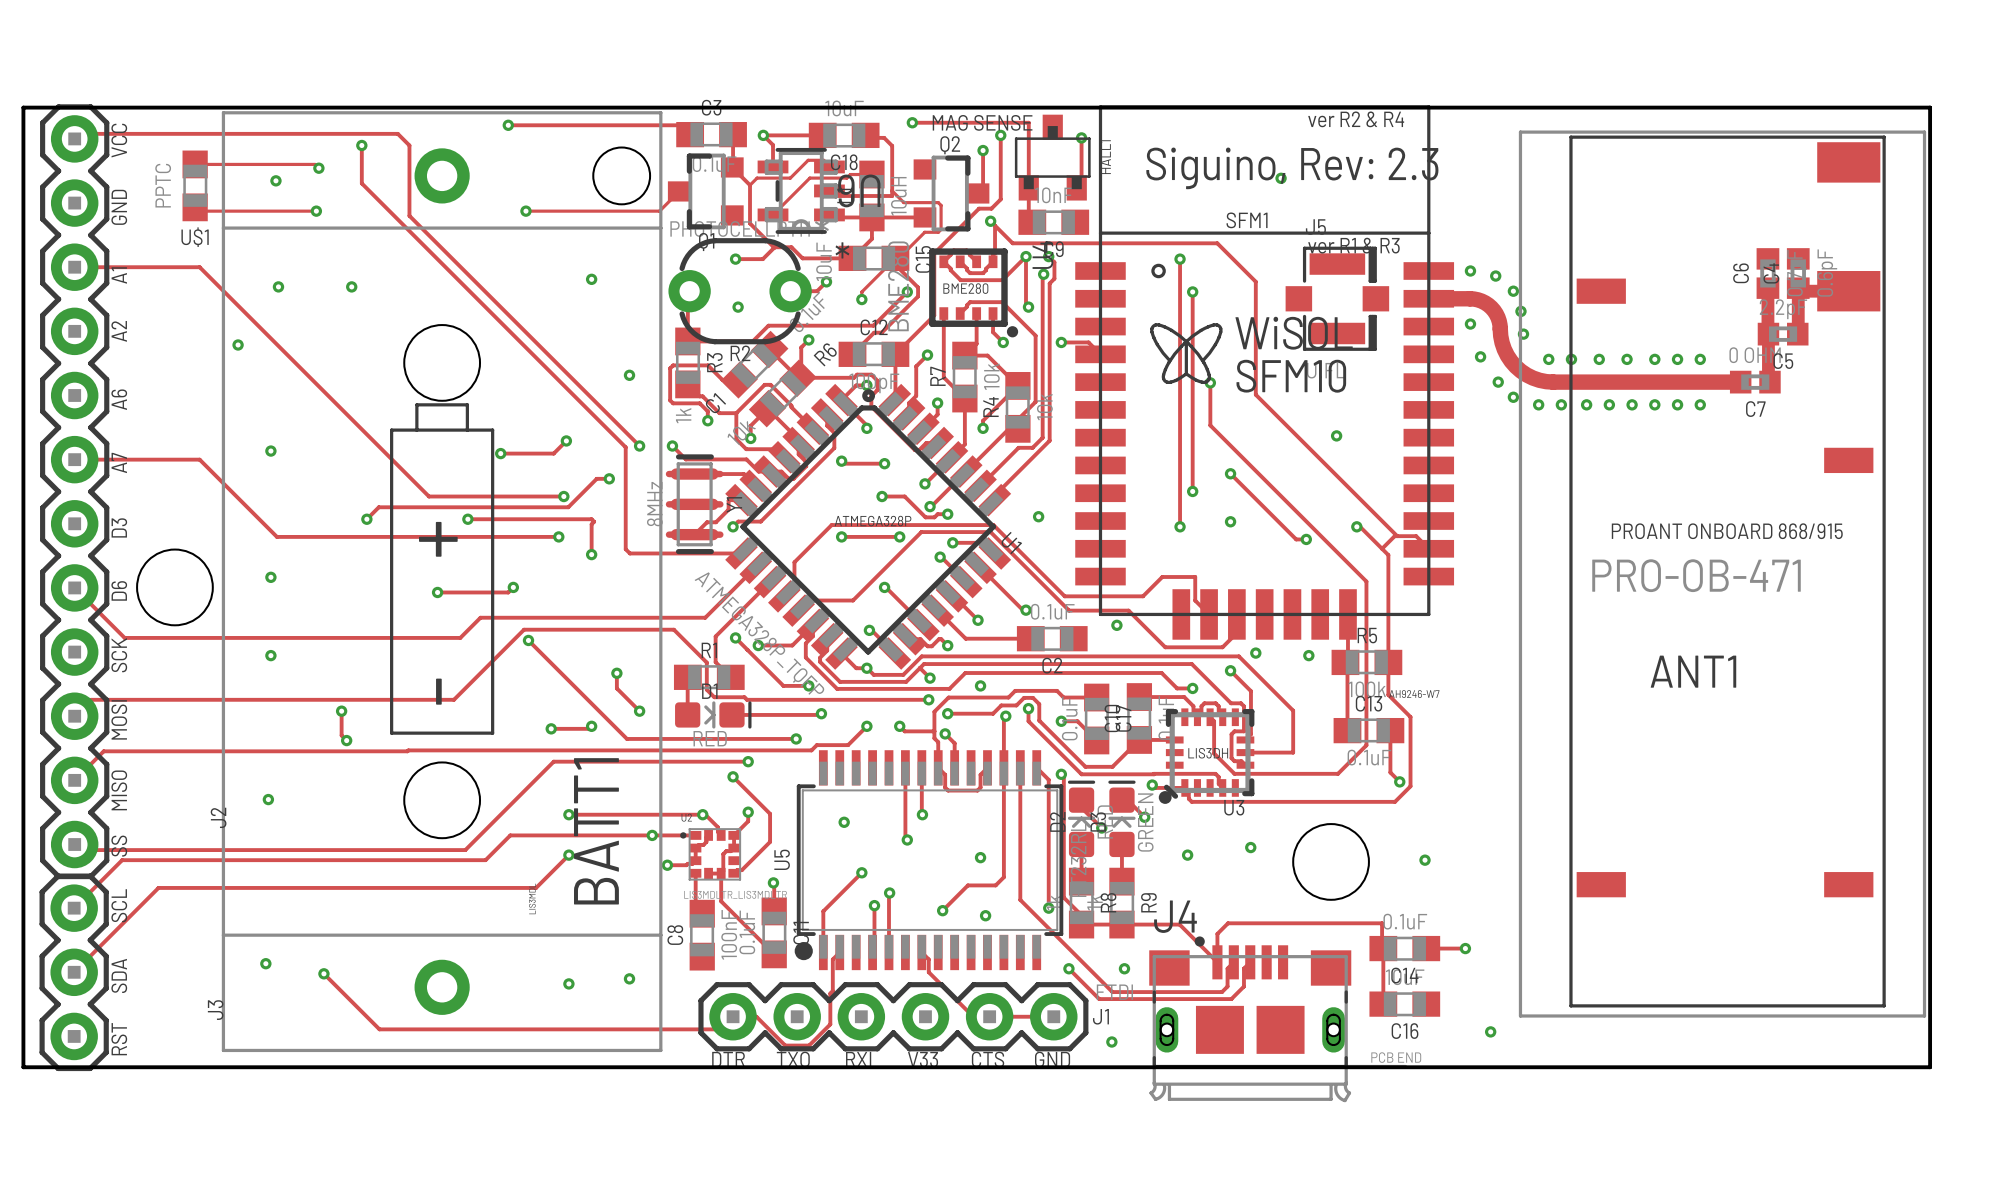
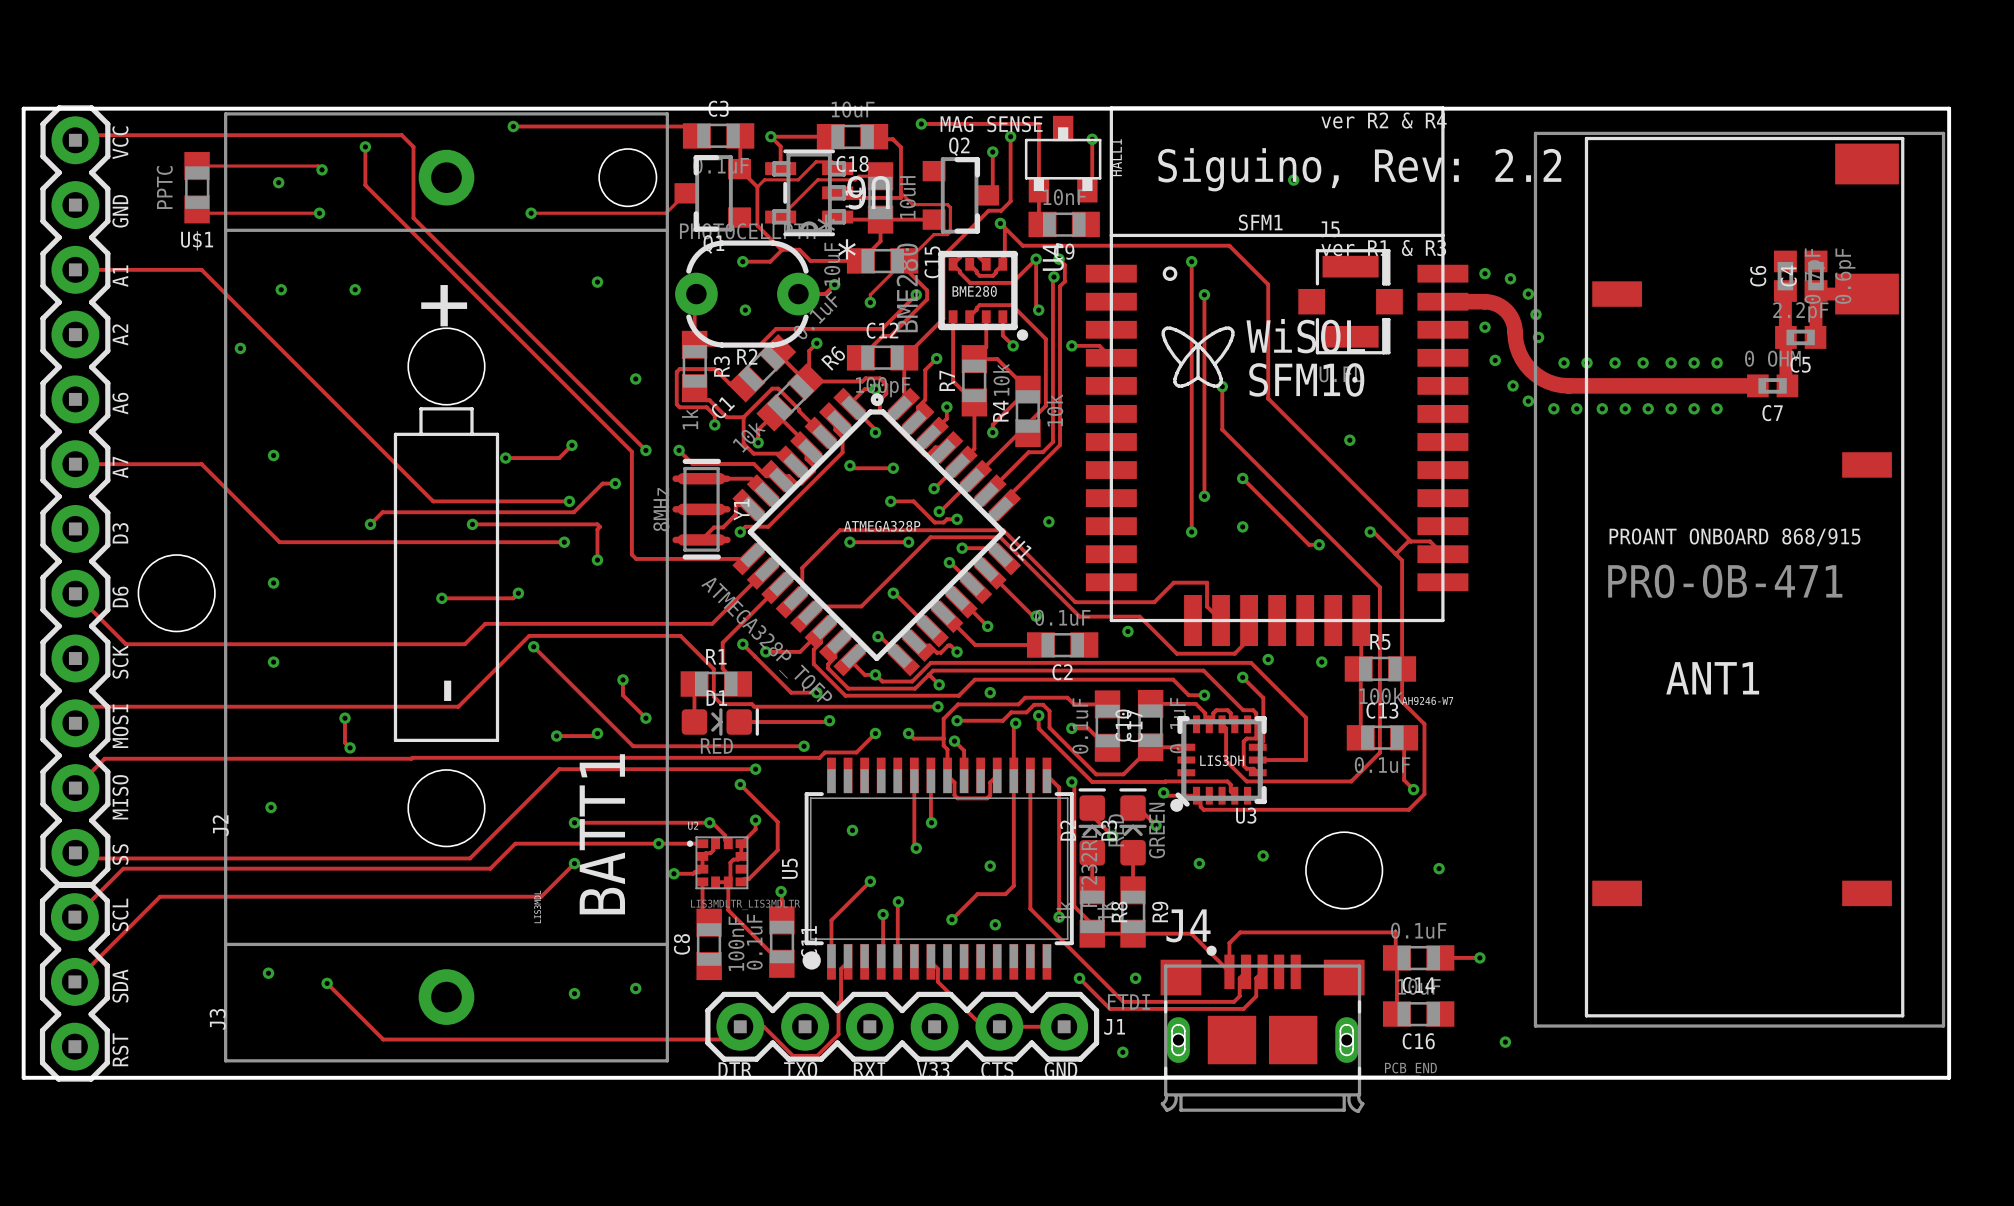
text: Siguino, Rev: 2.3 (1292, 168) -> Siguino, Rev: 2.2 (1359, 169)

